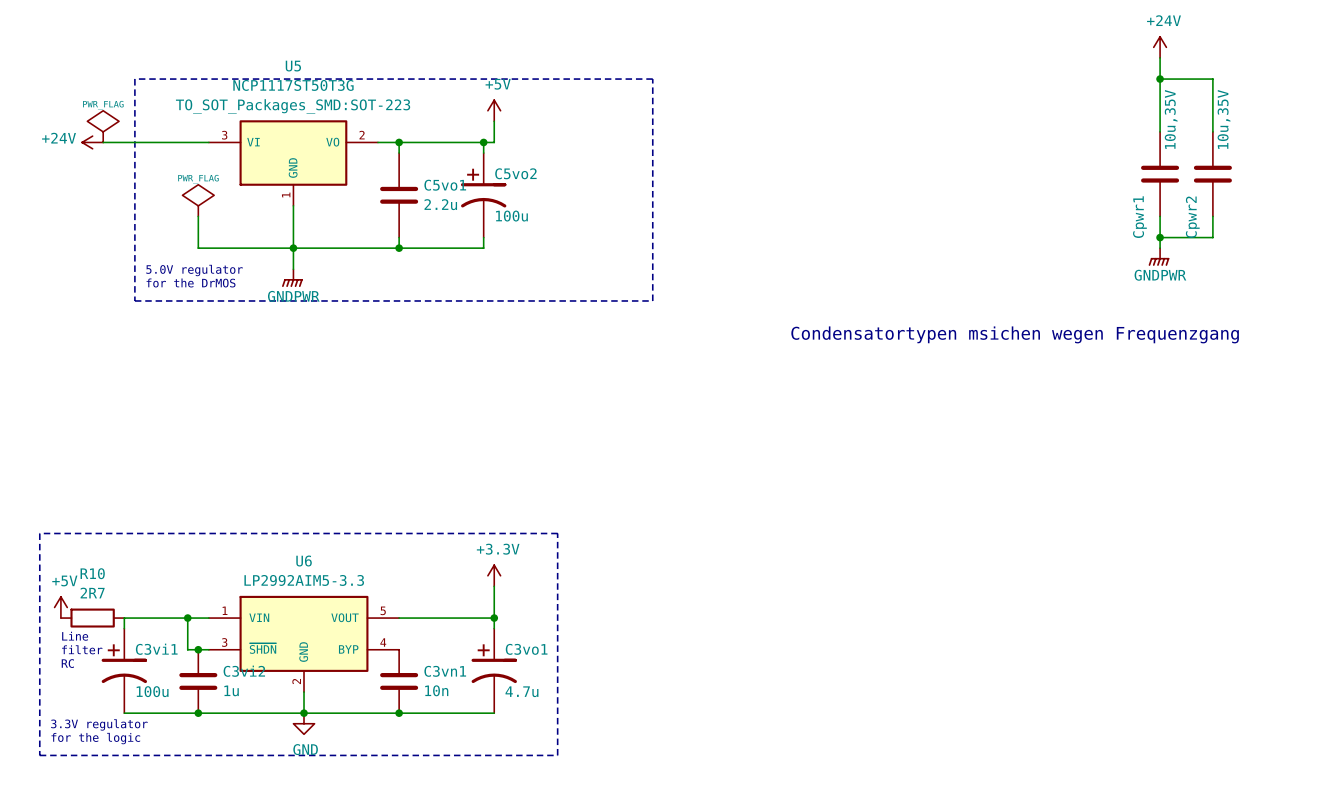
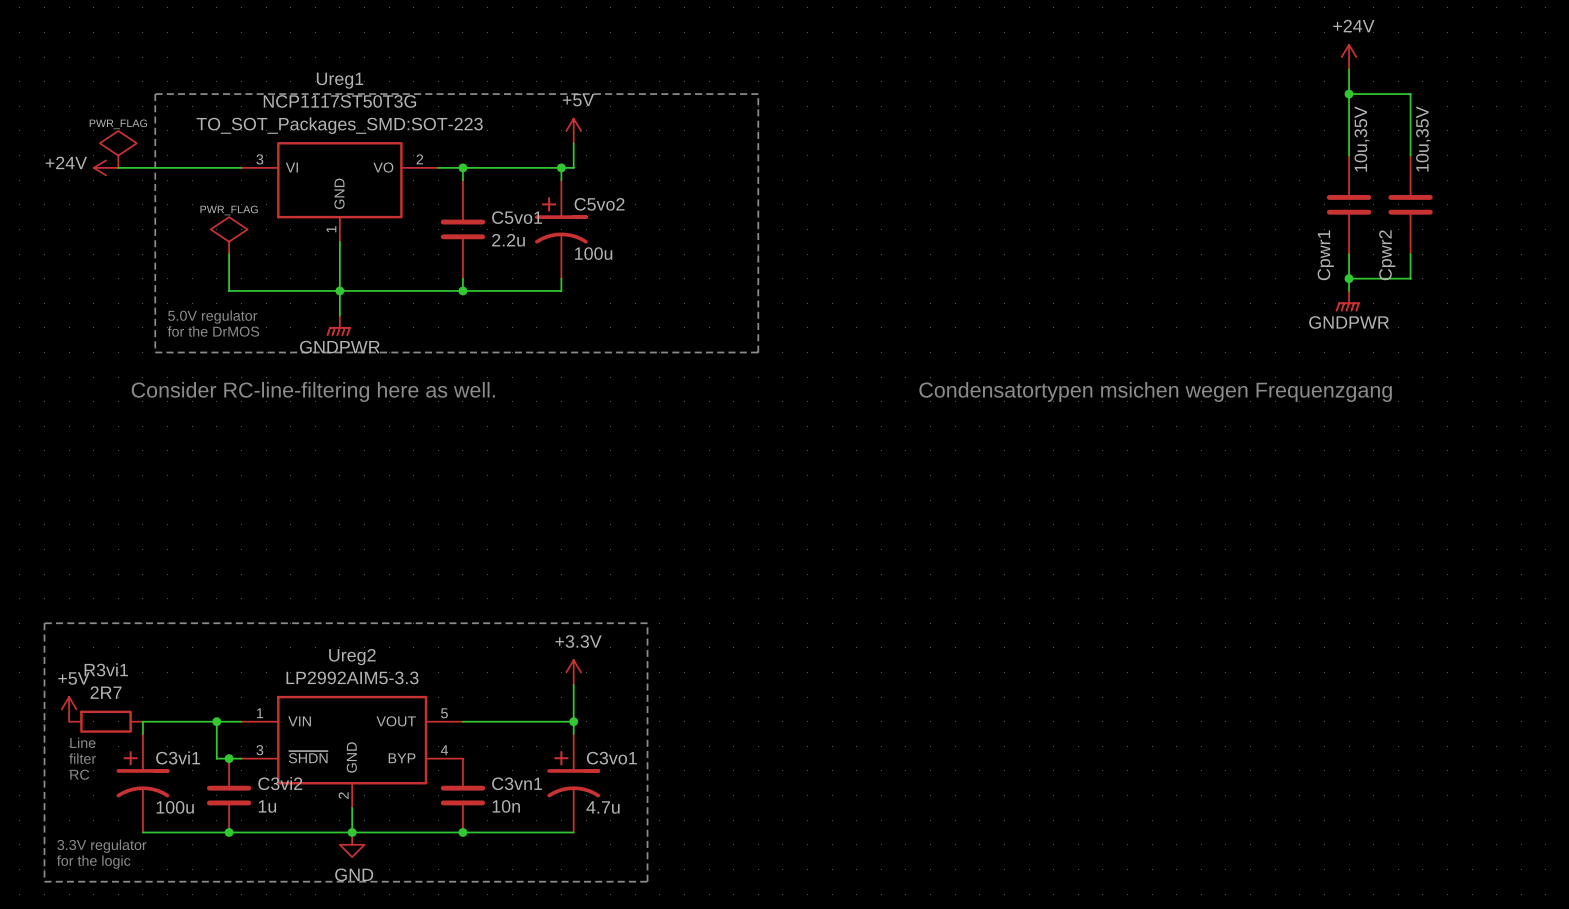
U5 name: U5 (293, 66) -> Ureg1 (340, 80)
text: none -> Consider RC-line-filtering here as well. (313, 391)
U6 name: U6 (304, 561) -> Ureg2 (352, 657)
R10 name: R10 (92, 573) -> R3vi1 (106, 669)

